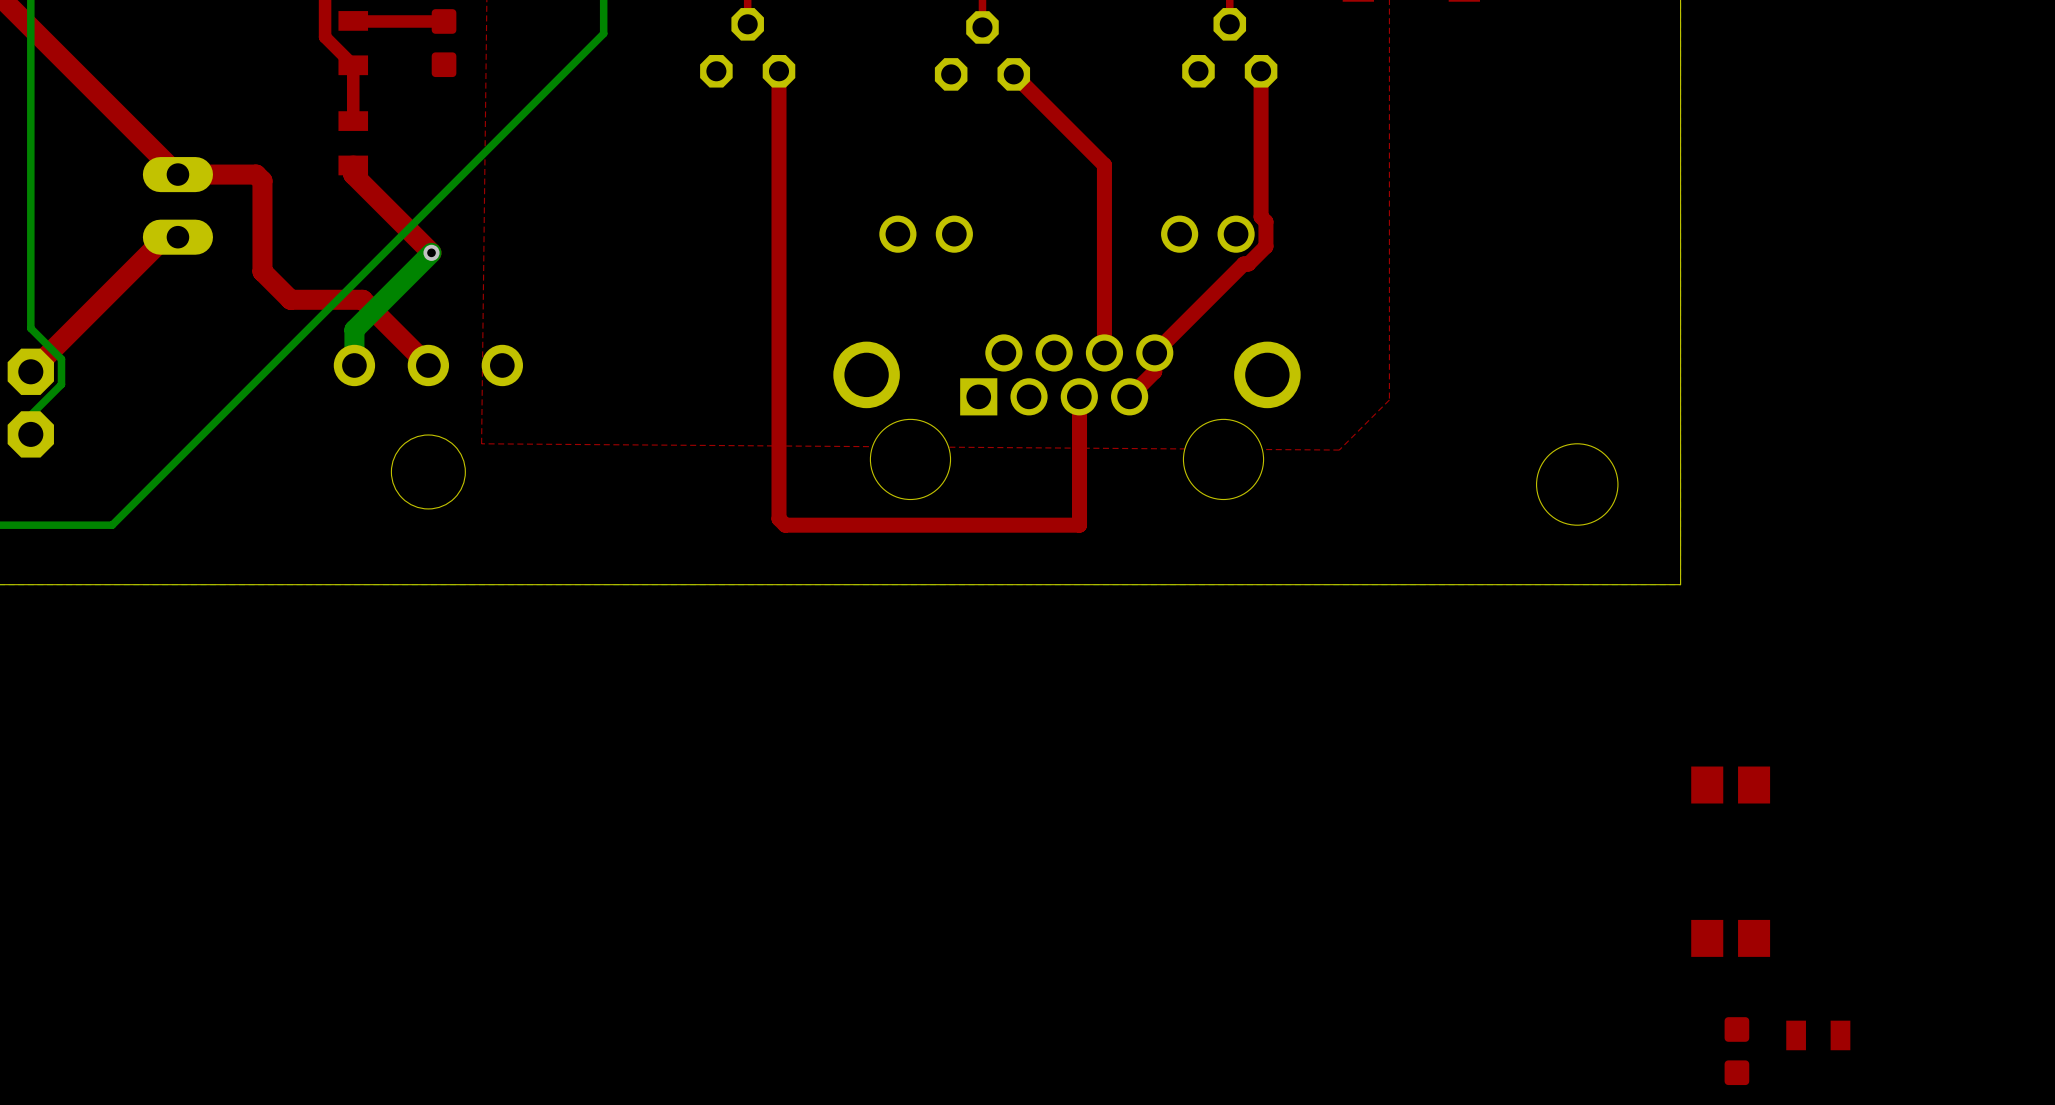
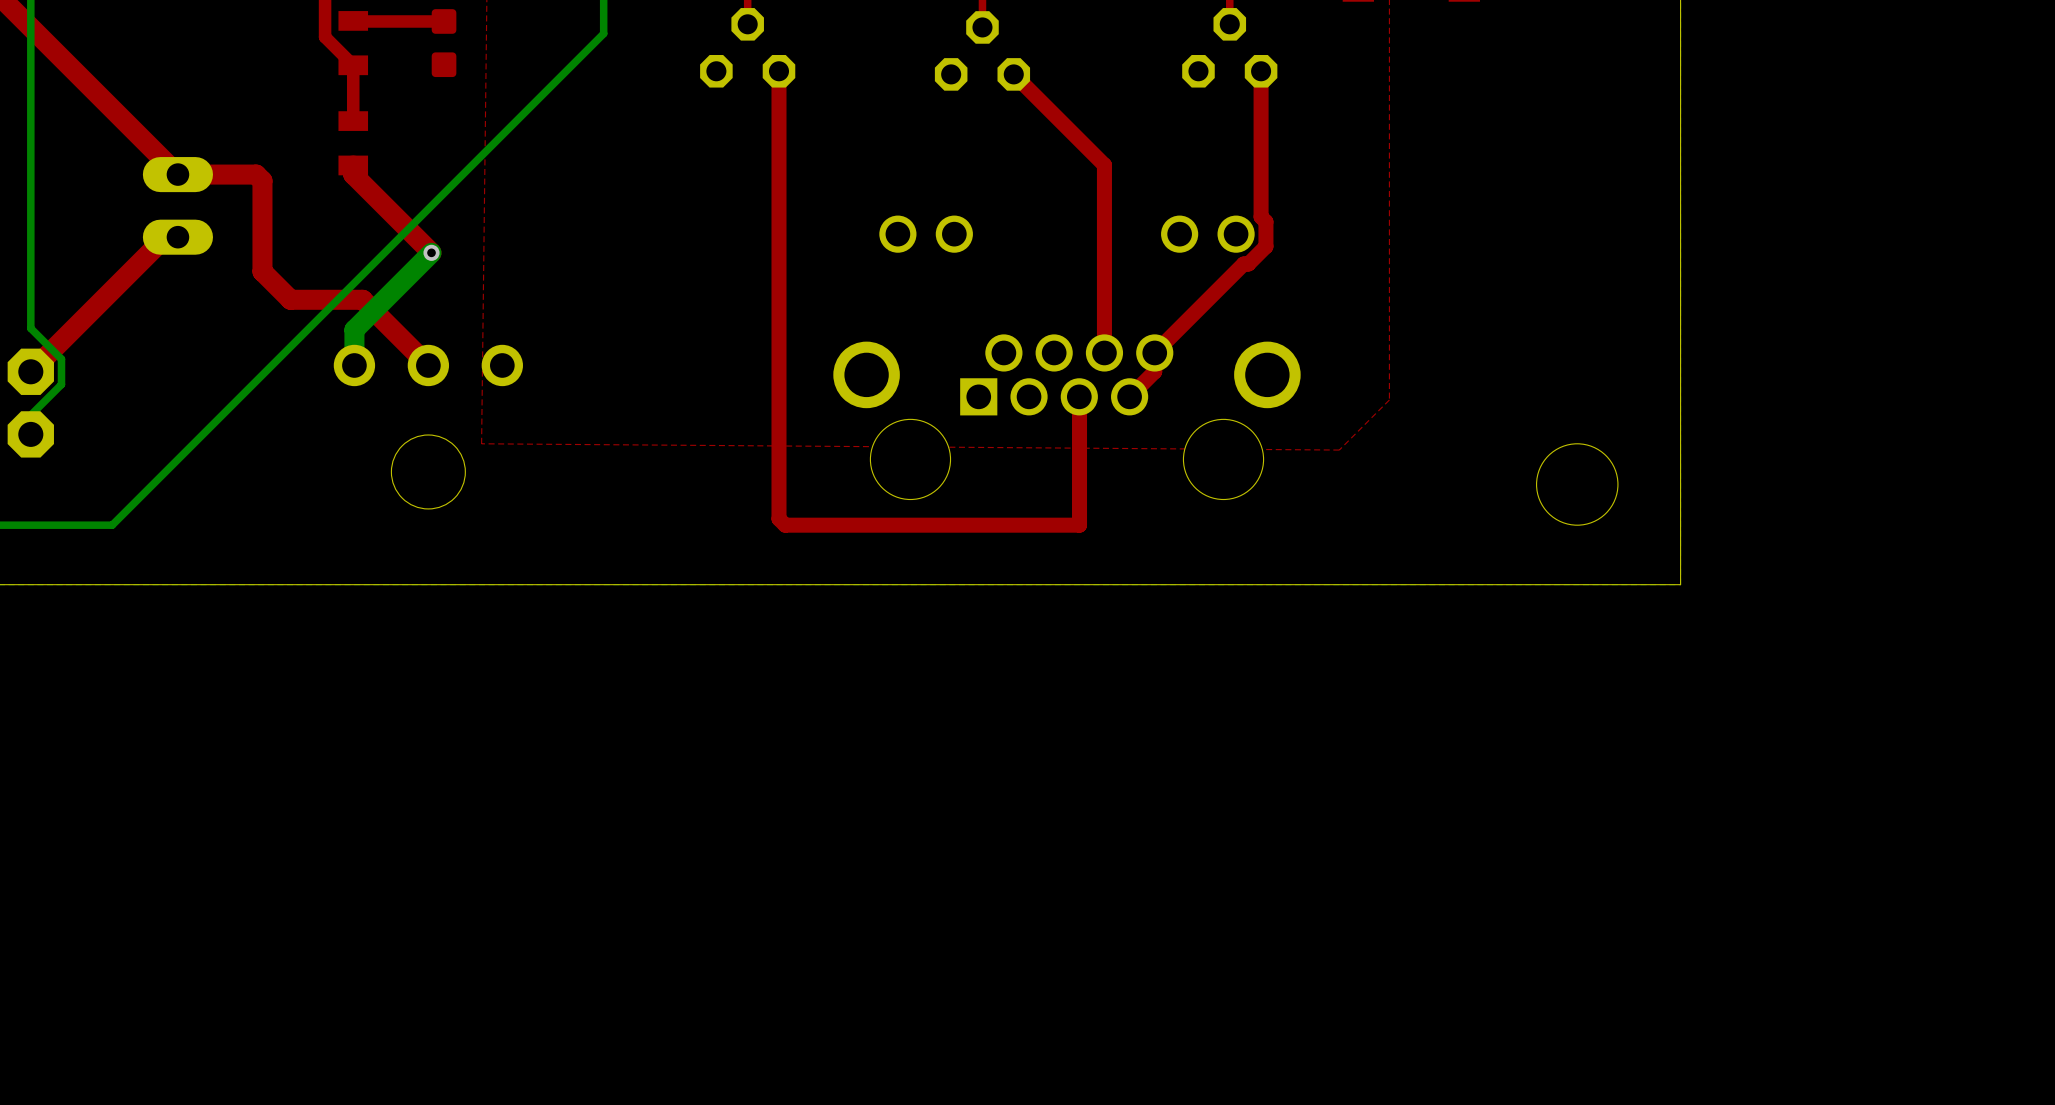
part: (1730, 785) -> none
part: (1730, 938) -> none
part: (1818, 1035) -> none
part: (1736, 1051) -> none

